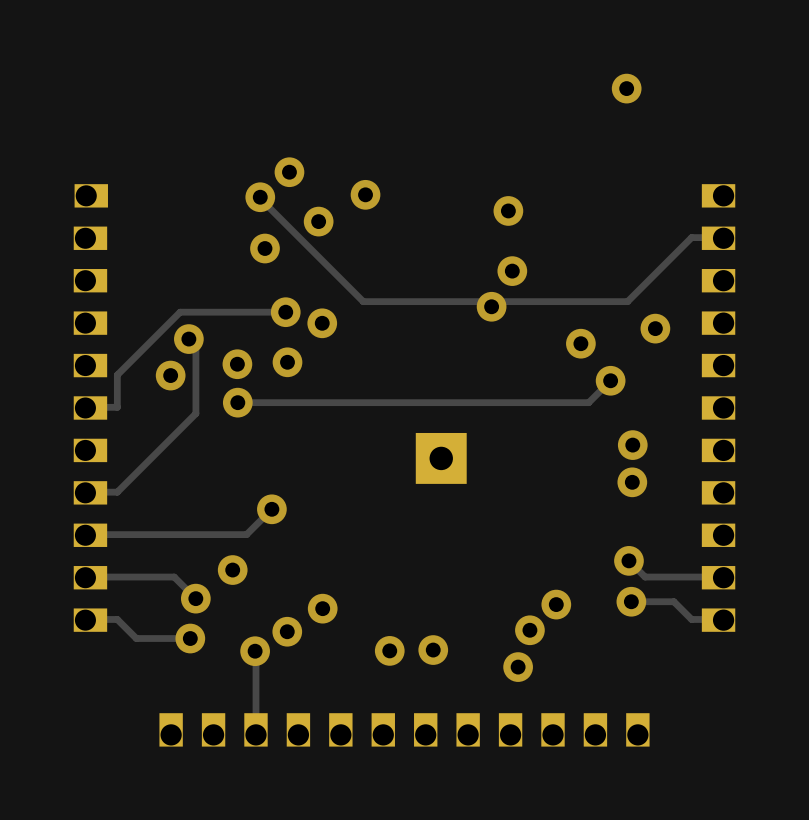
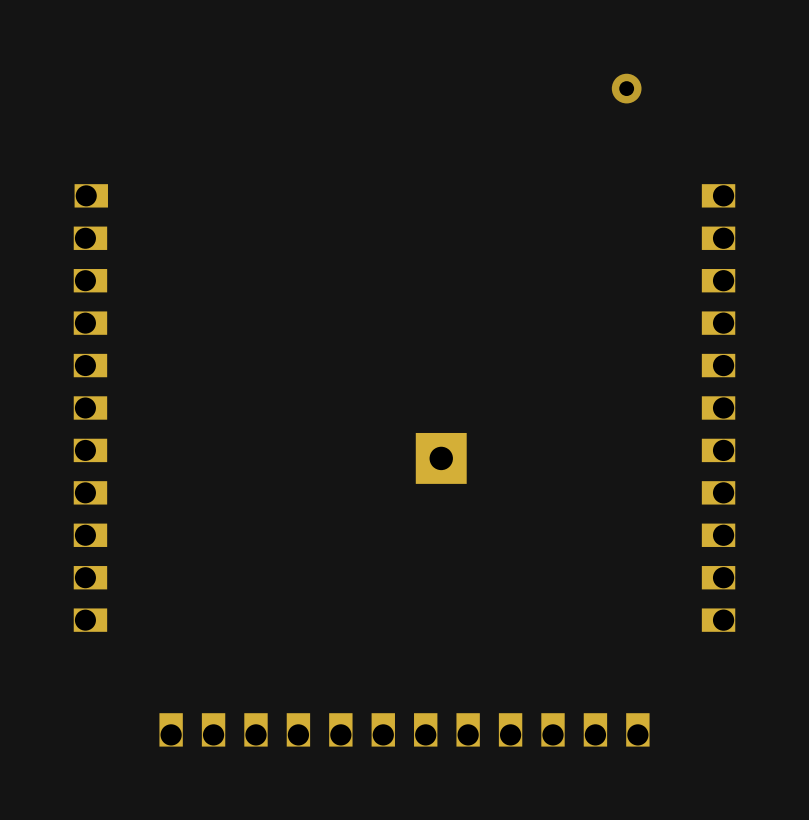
via: (289, 172) -> none
via: (365, 194) -> none
track: (260, 197) (363, 301) (627, 301) (691, 237) (723, 237) -> none
via: (260, 197) -> none
via: (508, 210) -> none
via: (318, 221) -> none
via: (264, 248) -> none
via: (512, 271) -> none
via: (491, 306) -> none
track: (285, 312) (180, 312) (117, 375) (117, 407) (85, 407) -> none
via: (285, 312) -> none
via: (322, 323) -> none
via: (655, 328) -> none
track: (188, 339) (195, 346) (195, 413) (117, 492) (85, 492) -> none
via: (188, 339) -> none
via: (580, 343) -> none
via: (287, 362) -> none
via: (237, 364) -> none
via: (170, 375) -> none
track: (610, 380) (588, 402) (237, 402) -> none
via: (610, 380) -> none
via: (237, 402) -> none
via: (632, 445) -> none
via: (632, 482) -> none
track: (271, 509) (246, 534) (85, 534) -> none
via: (271, 509) -> none
track: (628, 560) (645, 577) (723, 577) -> none
via: (628, 560) -> none
via: (232, 570) -> none
track: (85, 577) (174, 577) (195, 598) -> none
via: (195, 598) -> none
track: (631, 601) (673, 601) (691, 619) (723, 619) -> none
via: (631, 601) -> none
via: (556, 604) -> none
via: (322, 608) -> none
track: (85, 619) (117, 619) (136, 638) (190, 638) -> none
via: (529, 630) -> none
via: (287, 631) -> none
via: (190, 638) -> none
via: (389, 650) -> none
via: (433, 650) -> none
track: (255, 651) (255, 734) -> none
via: (255, 651) -> none
via: (518, 667) -> none

